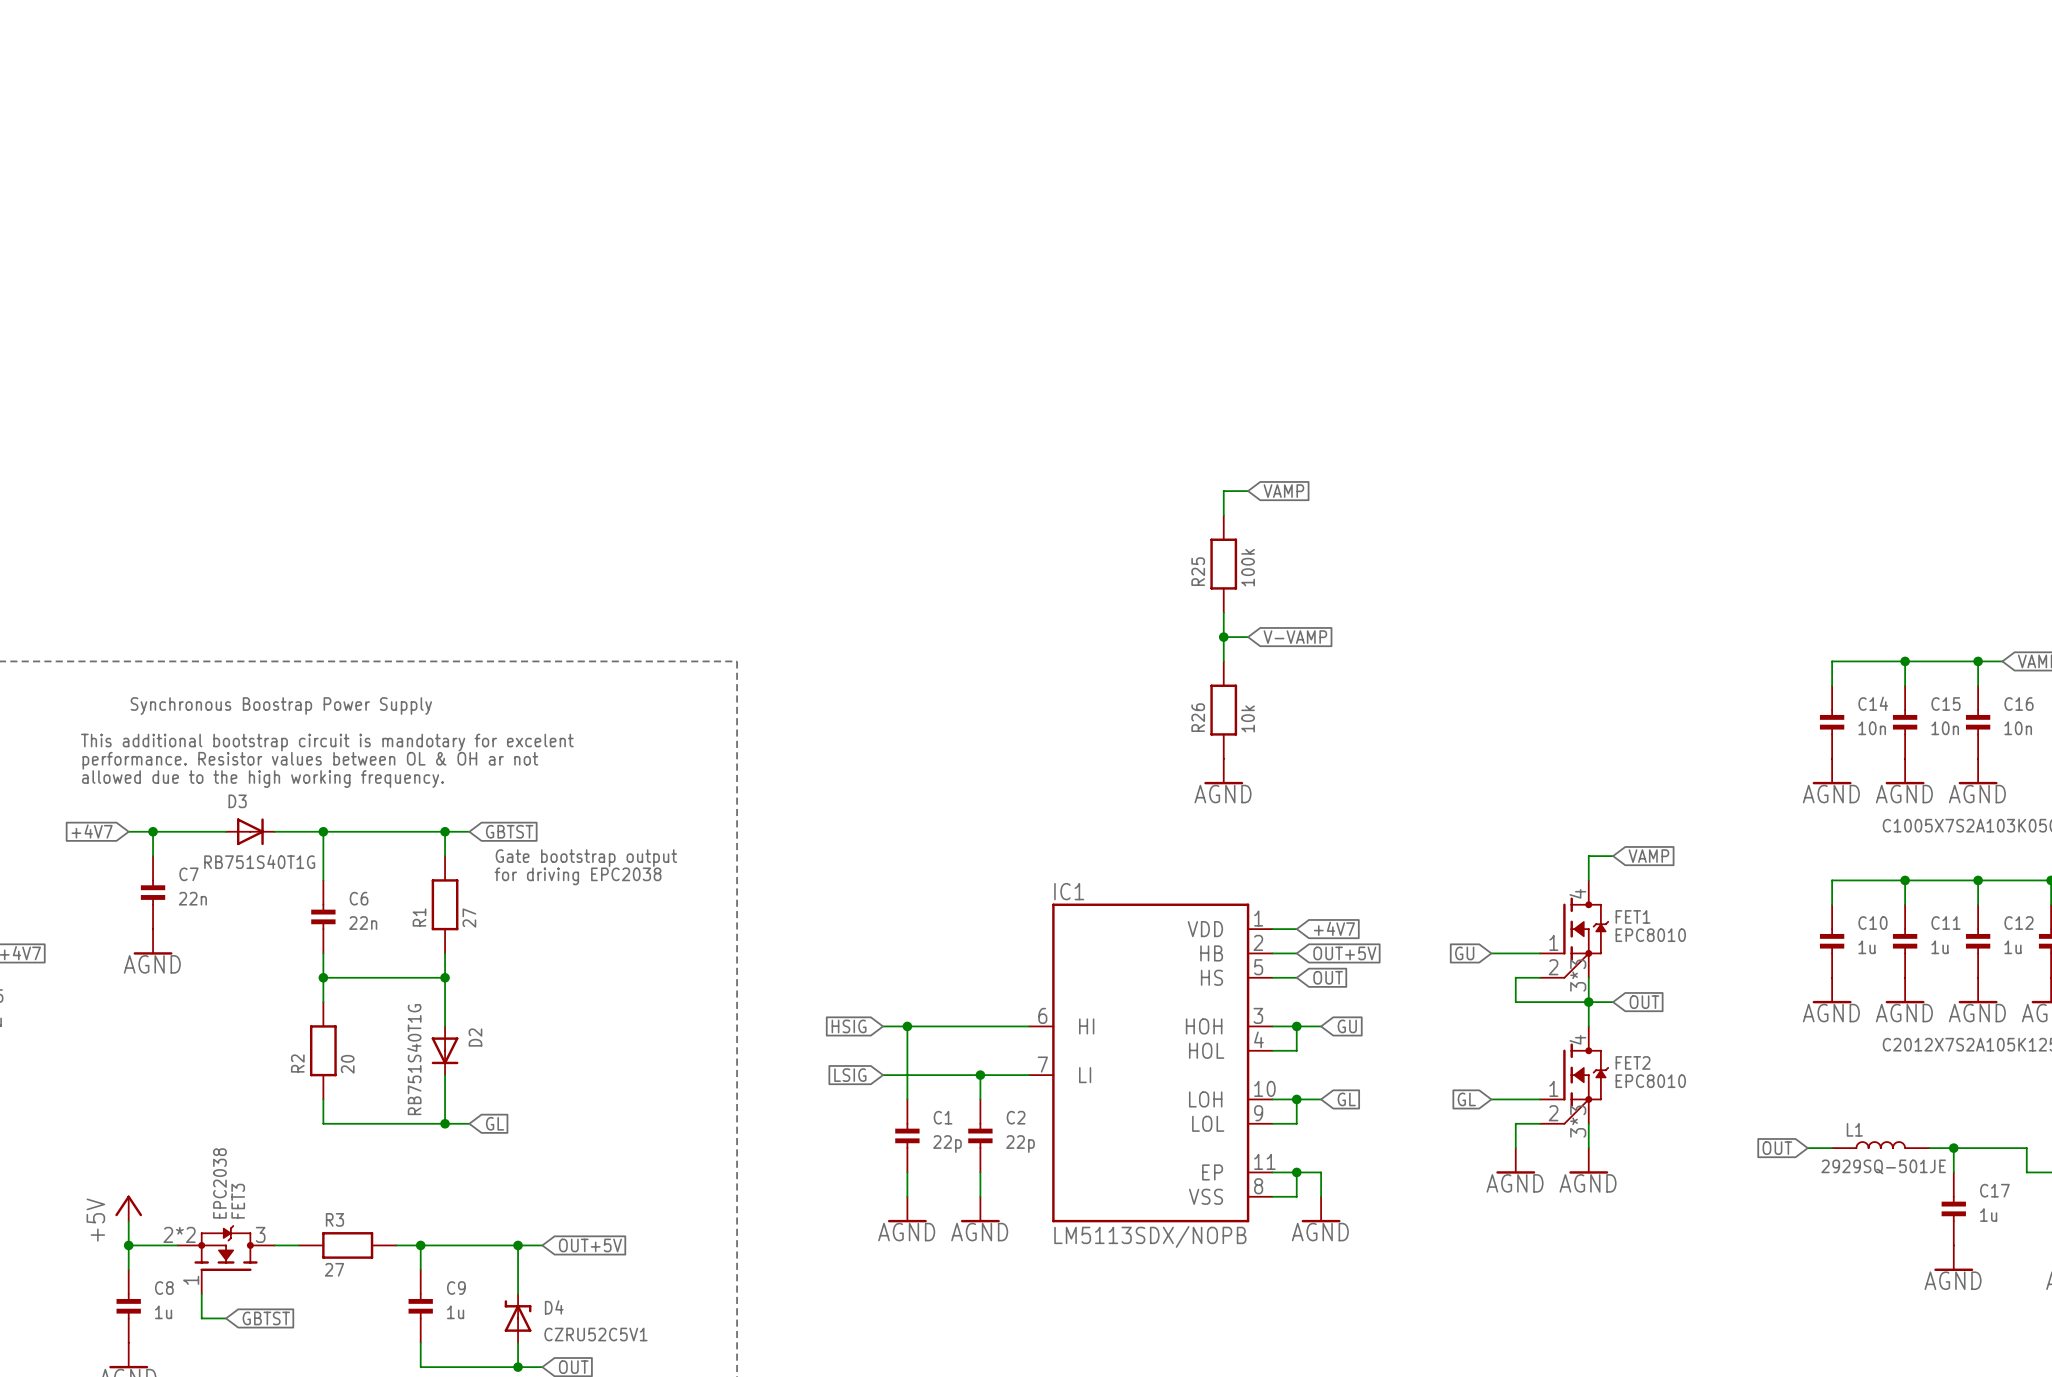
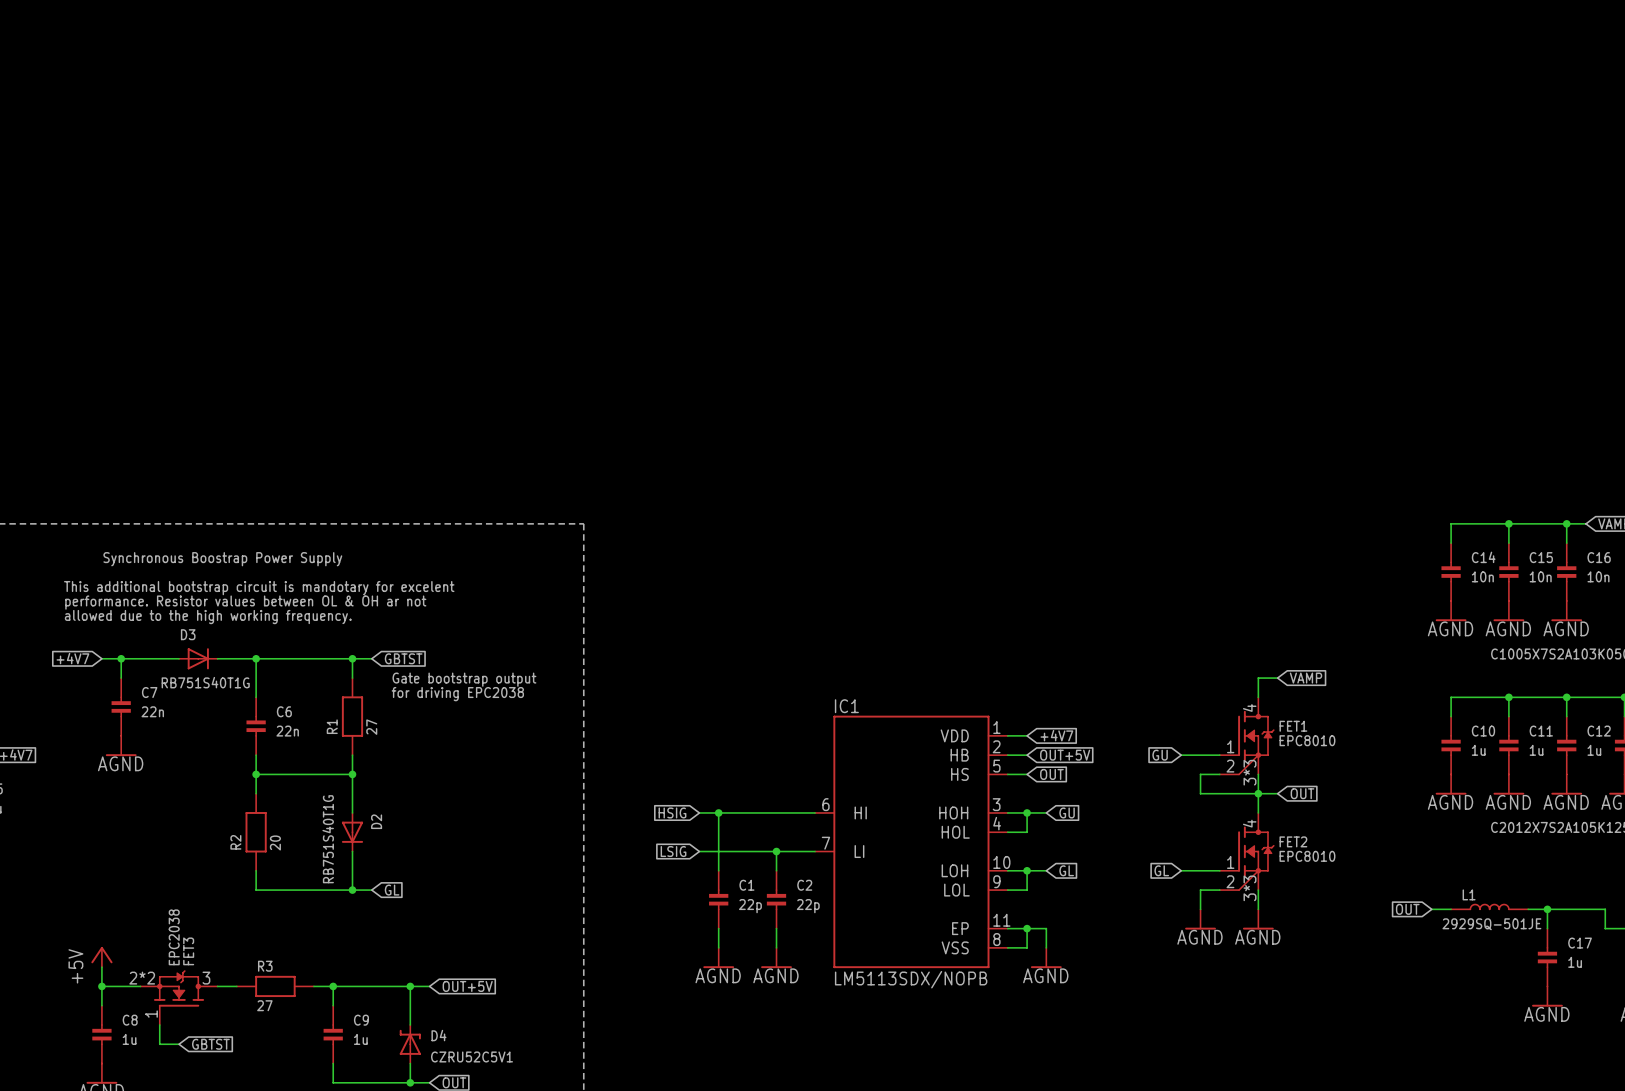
wire: (1248, 491) (1223, 491) (1223, 515) -> none
global label: VAMP (1283, 491) -> none
R25: 100k (1223, 564) -> none
wire: (1223, 612) (1223, 661) -> none
wire: (1223, 637) (1248, 637) -> none
junction: (1223, 637) -> none
global label: V-VAMP (1295, 637) -> none
R26: 10k (1223, 710) -> none
power symbol: AGND (1223, 771) -> none

